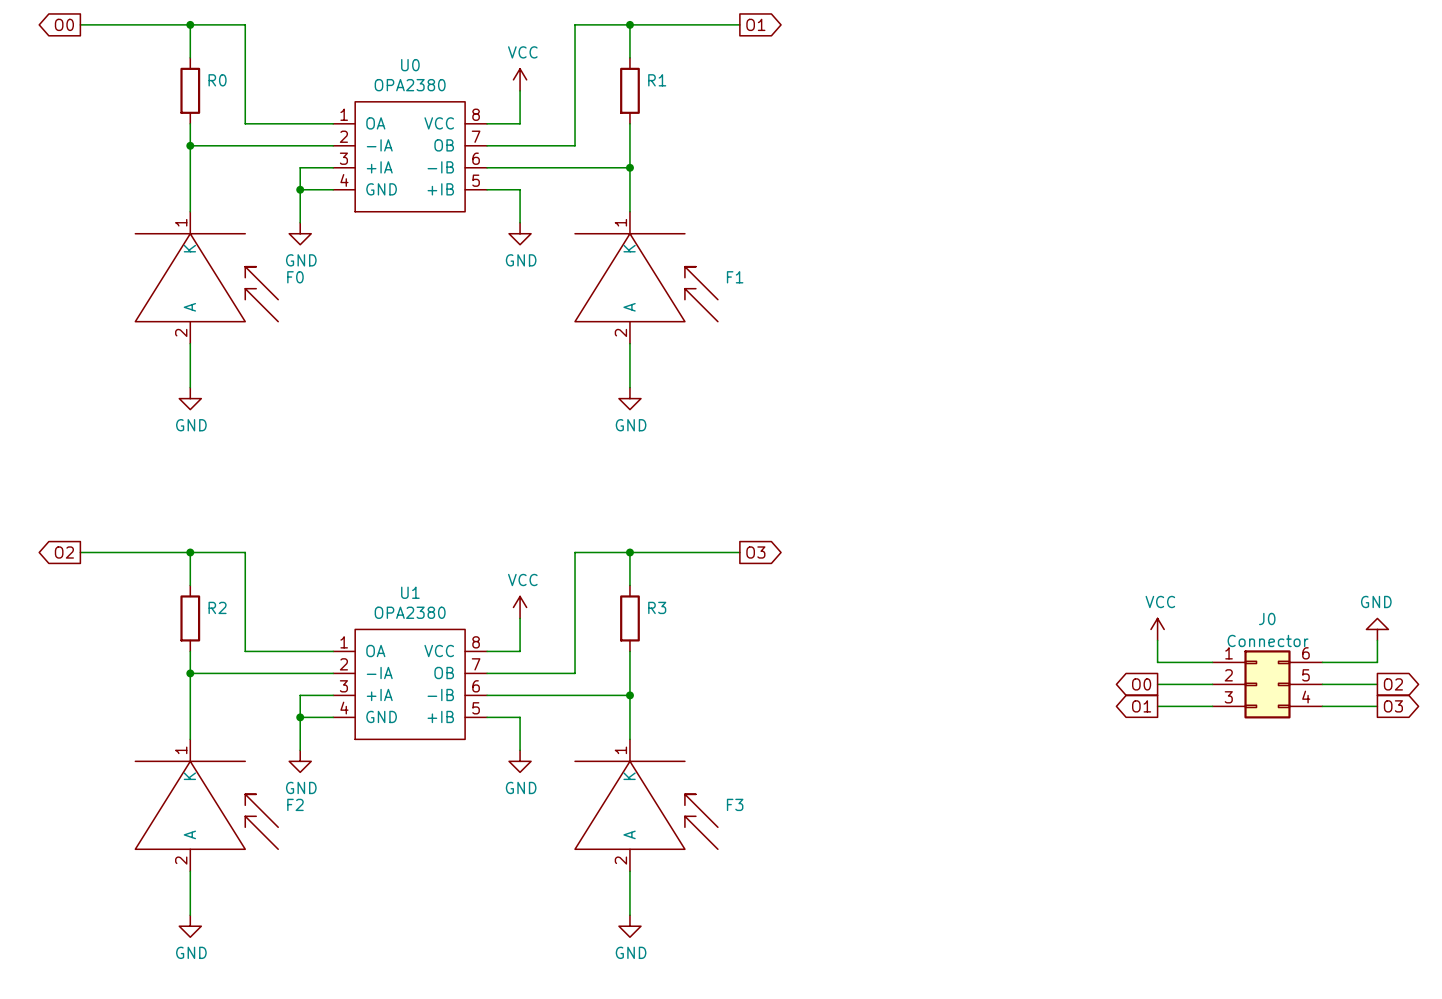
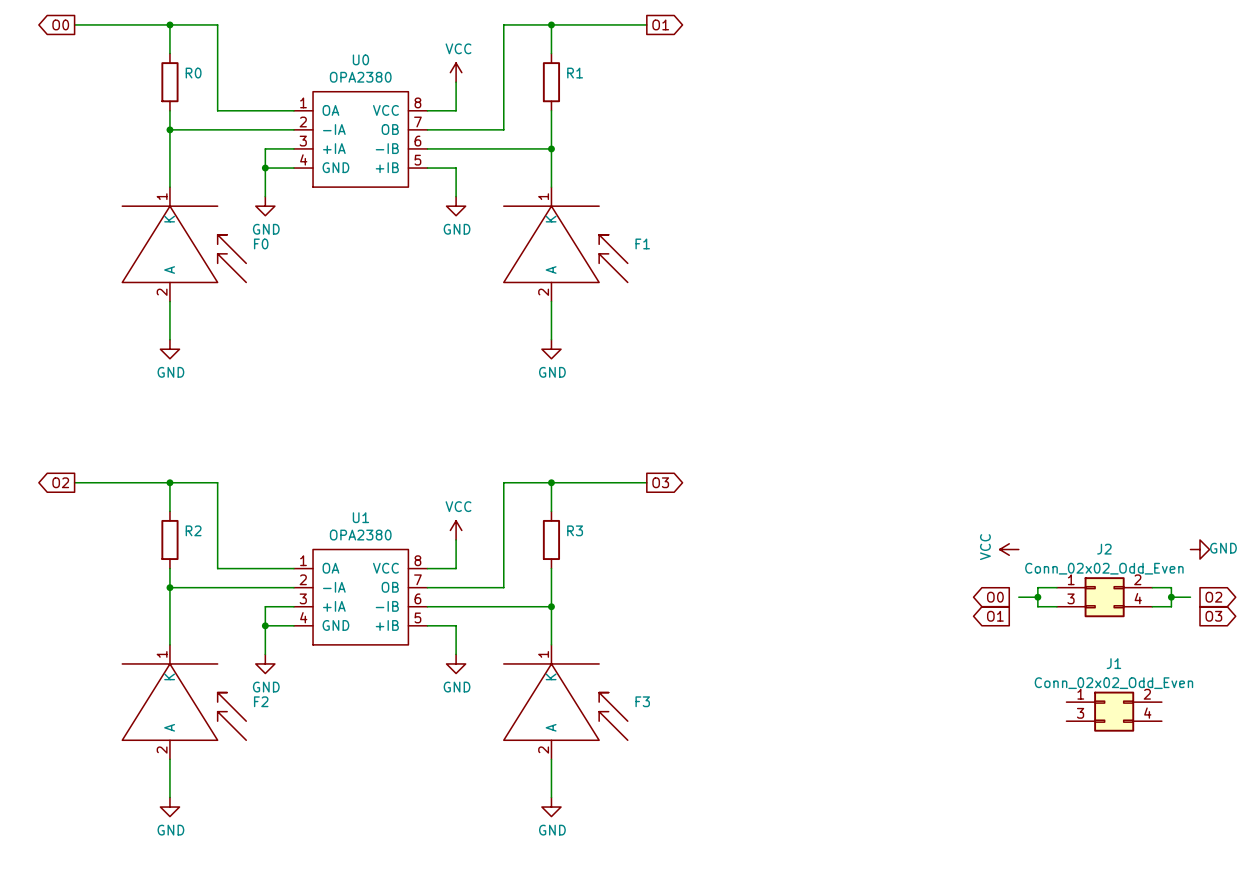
power symbol rotation: 0° (1157, 629) -> 90° counterclockwise (1009, 549)
power symbol rotation: 0° (1377, 629) -> 90° clockwise (1200, 549)
wire: (1157, 640) (1157, 662) (1212, 662) -> none
wire: (1377, 640) (1377, 662) (1322, 662) -> none
wire: none -> (1056, 587) (1037, 587) (1037, 606) (1056, 606)
wire: none -> (1152, 587) (1171, 587) (1171, 606) (1152, 606)
wire: (1157, 684) (1168, 684) -> none
wire: (1190, 684) (1212, 684) -> none
junction: none -> (1037, 597)
J0: Connector (1267, 684) -> none
J2: none -> Conn_02x02_Odd_Even (1104, 597)
wire: (1322, 684) (1344, 684) -> none
junction: none -> (1171, 597)
wire: (1366, 684) (1377, 684) -> none
wire: (1157, 706) (1212, 706) -> none
wire: (1322, 706) (1377, 706) -> none
J1: none -> Conn_02x02_Odd_Even (1114, 711)

